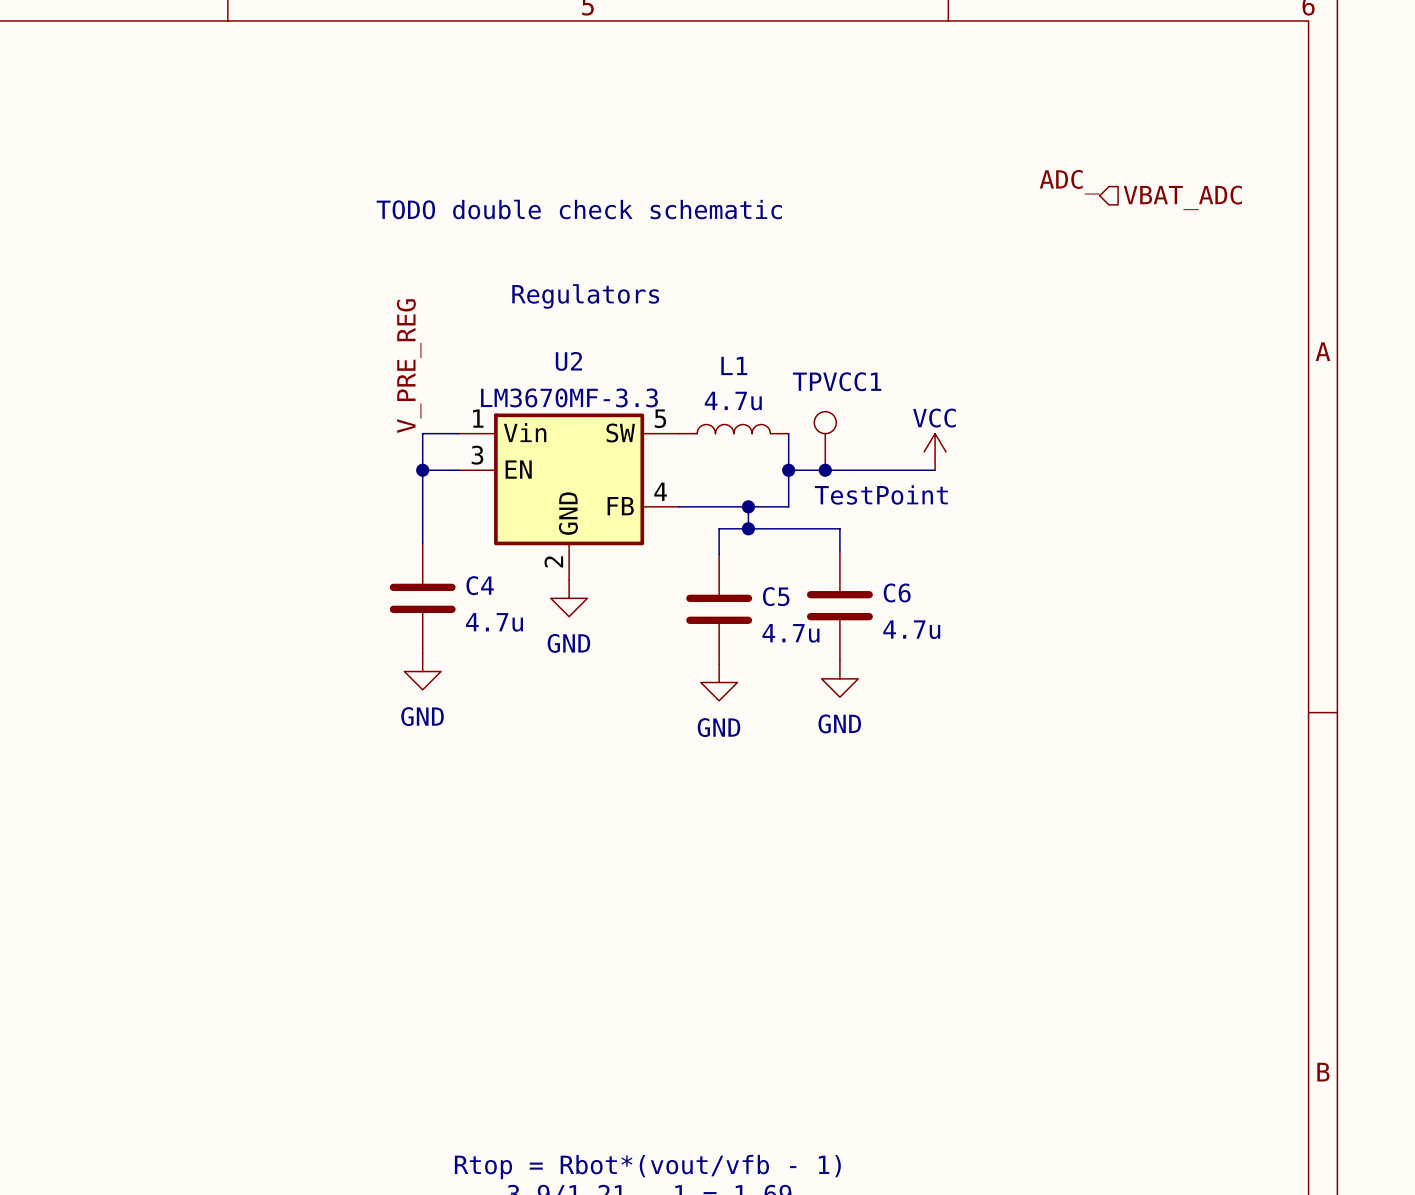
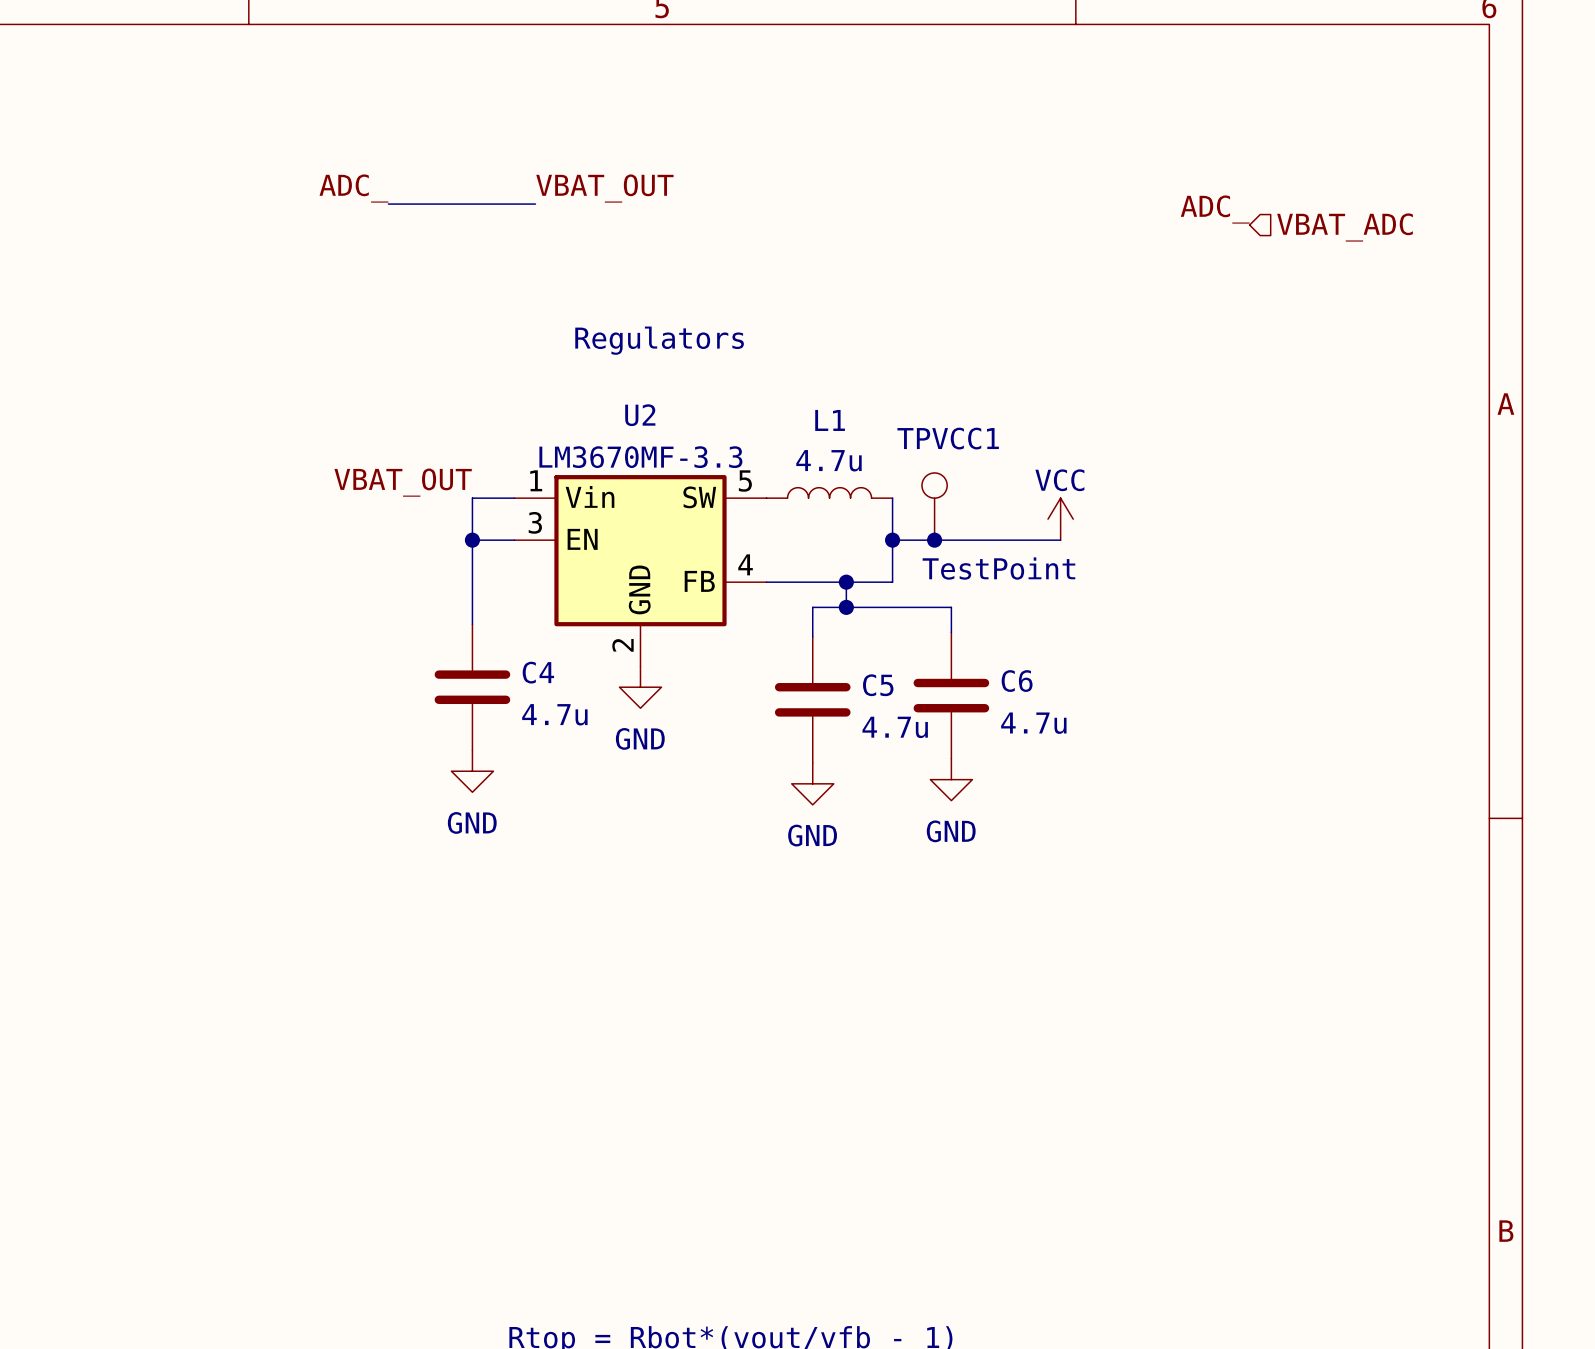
label: none -> ADC_ (353, 188)
label: none -> VBAT_OUT (604, 188)
wire: none -> (388, 204) (535, 204)
text: TODO double check schematic (579, 209) -> none
label: V_PRE_REG (409, 366) -> VBAT_OUT (403, 482)

